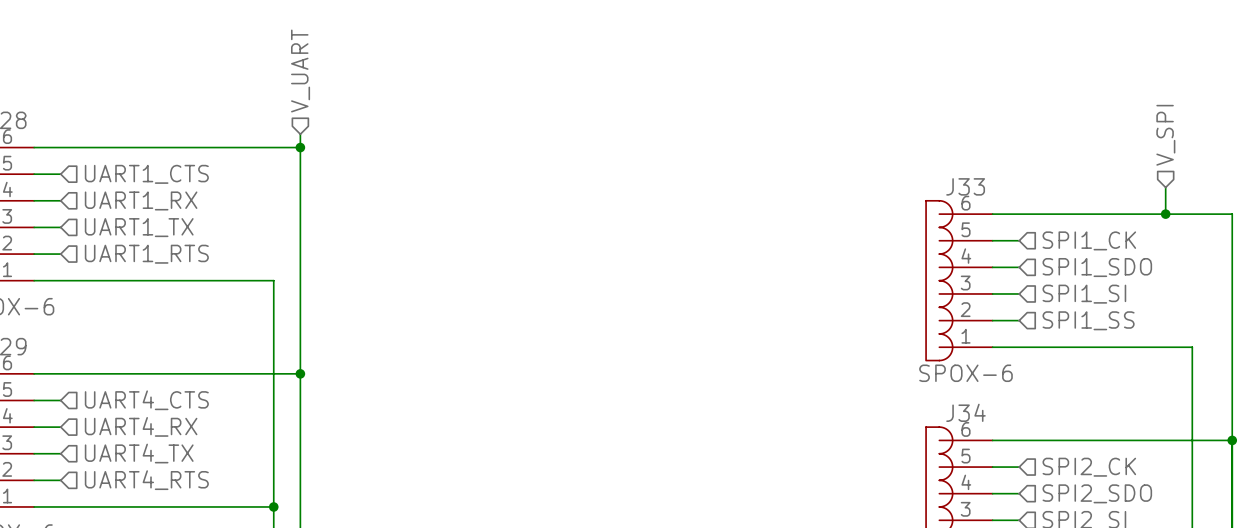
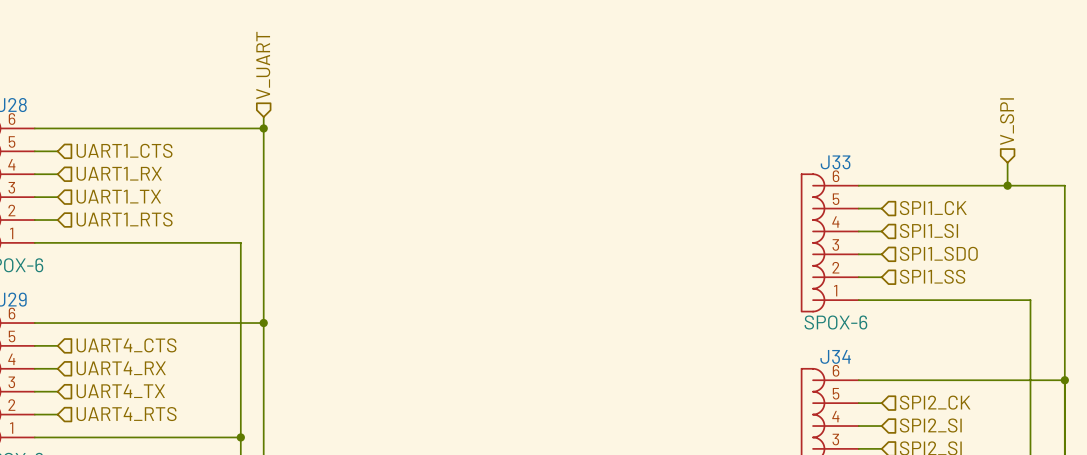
hierarchical label: SPI1_SDO (1097, 267) -> SPI1_SI (928, 230)
hierarchical label: SPI1_SI (1084, 294) -> SPI1_SDO (938, 253)
hierarchical label: SPI2_SDO (1097, 493) -> SPI2_SI (930, 425)

